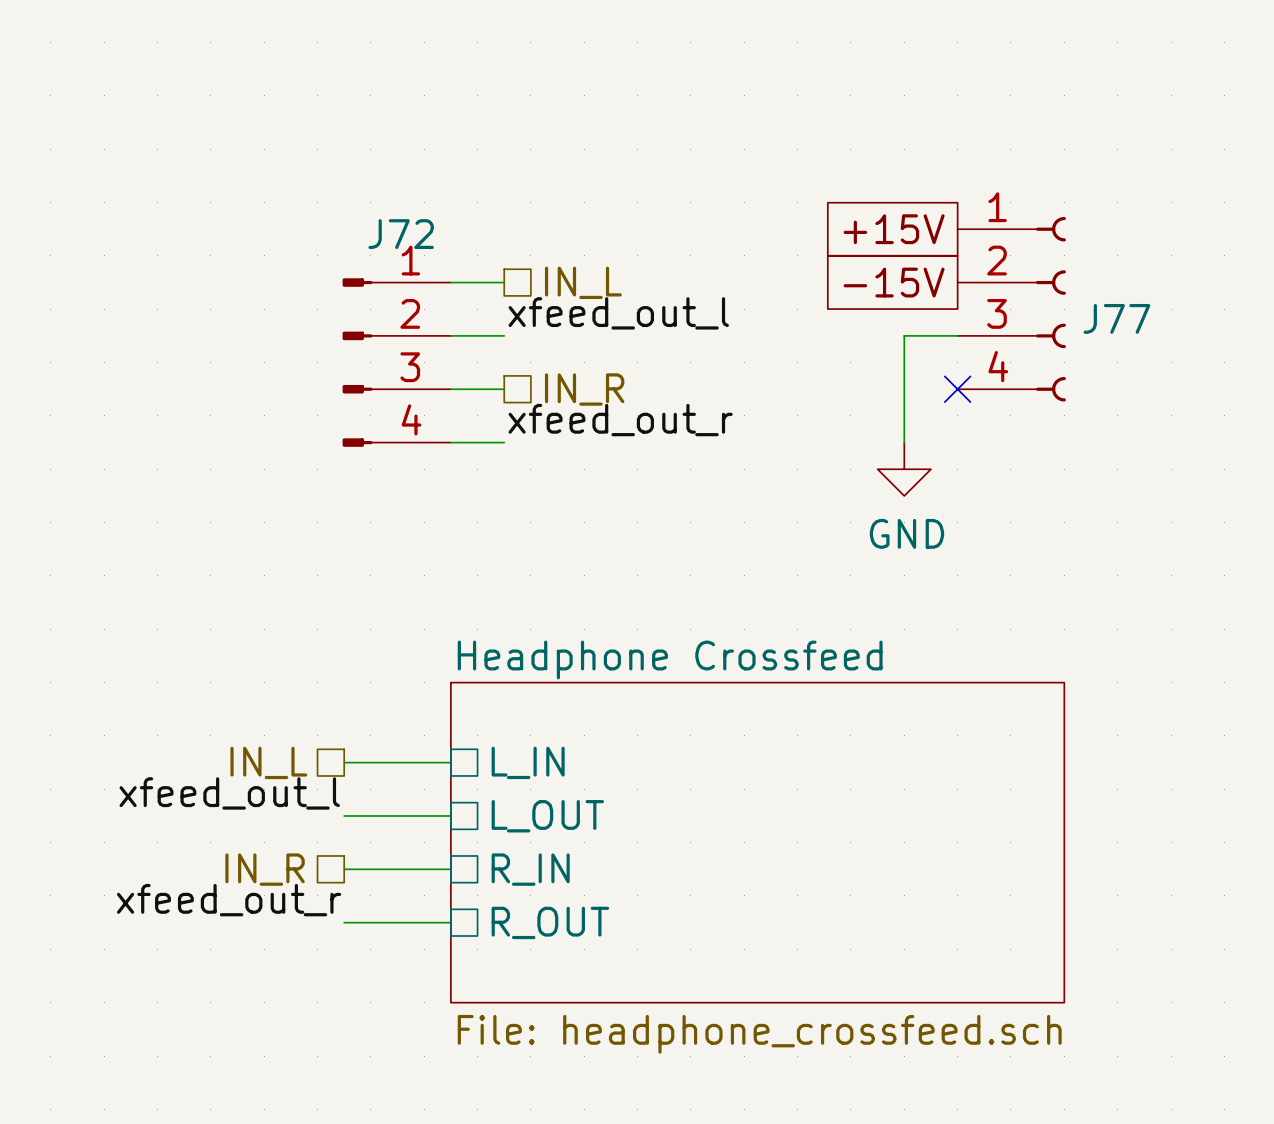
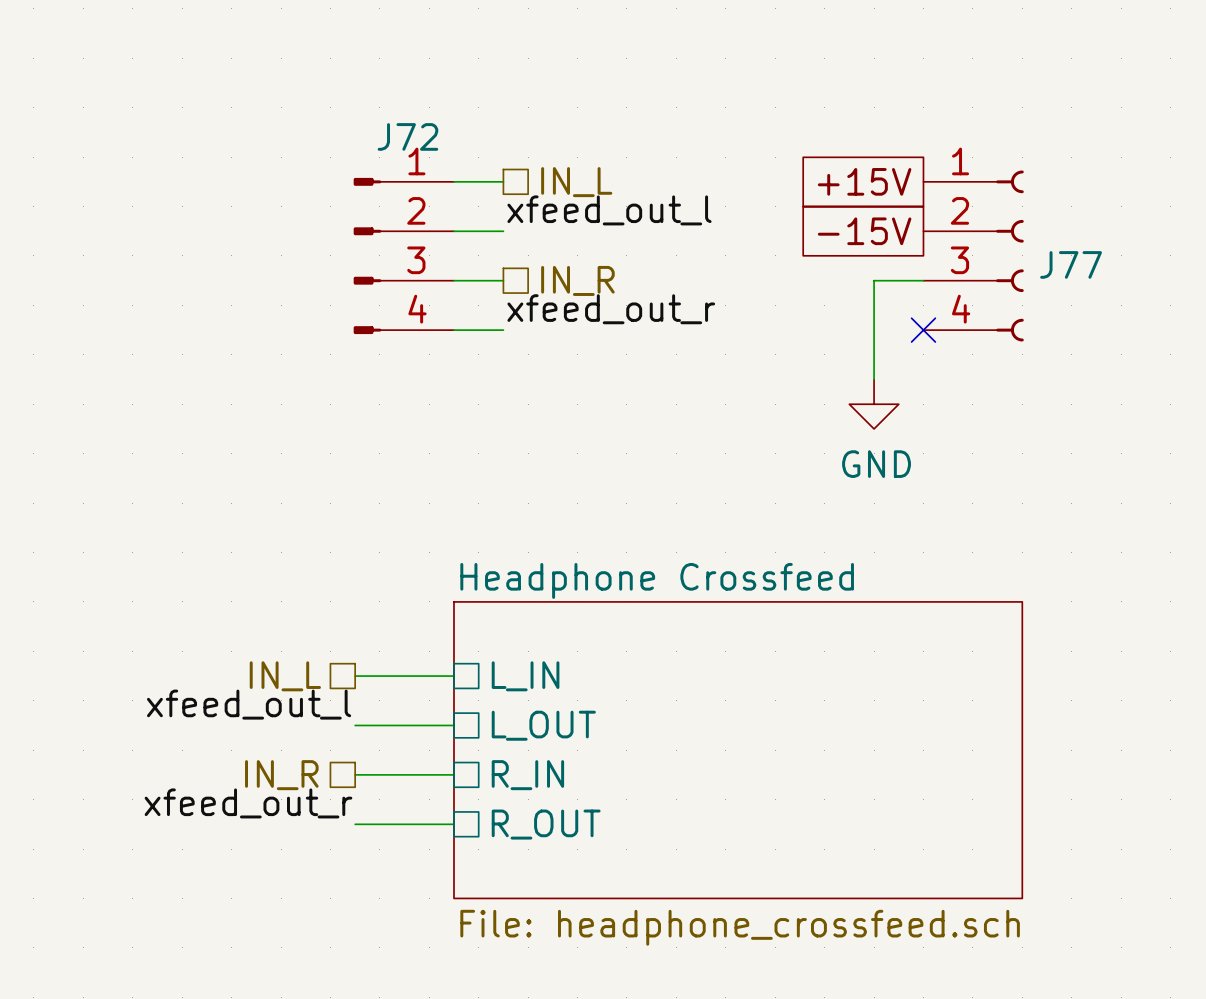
hierarchical label position: IN_L (583, 282) -> IN_L (576, 182)
label position: xfeed_out_l (618, 313) -> xfeed_out_l (609, 210)
J72 position: (396, 362) -> (403, 255)
hierarchical label position: IN_R (584, 389) -> IN_R (577, 280)
label position: xfeed_out_r (620, 420) -> xfeed_out_r (611, 309)
wire: (450, 442) (504, 442) -> (453, 181) (503, 181)

